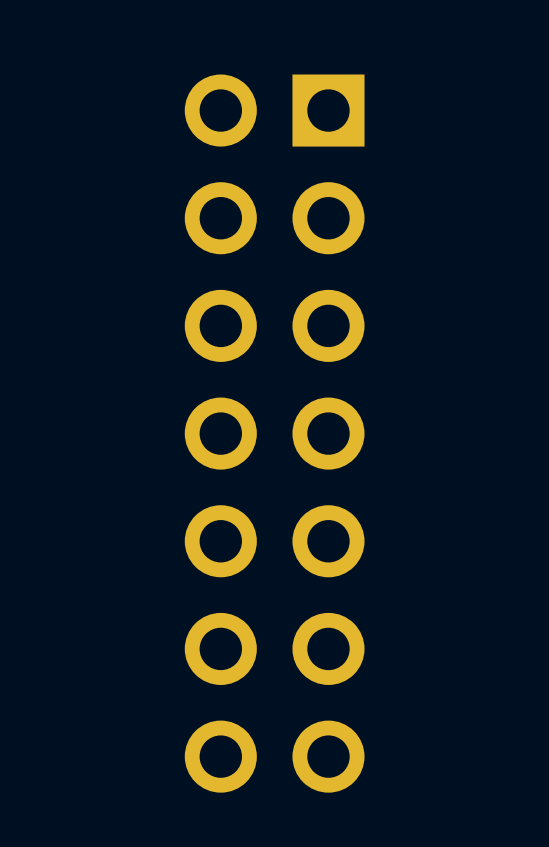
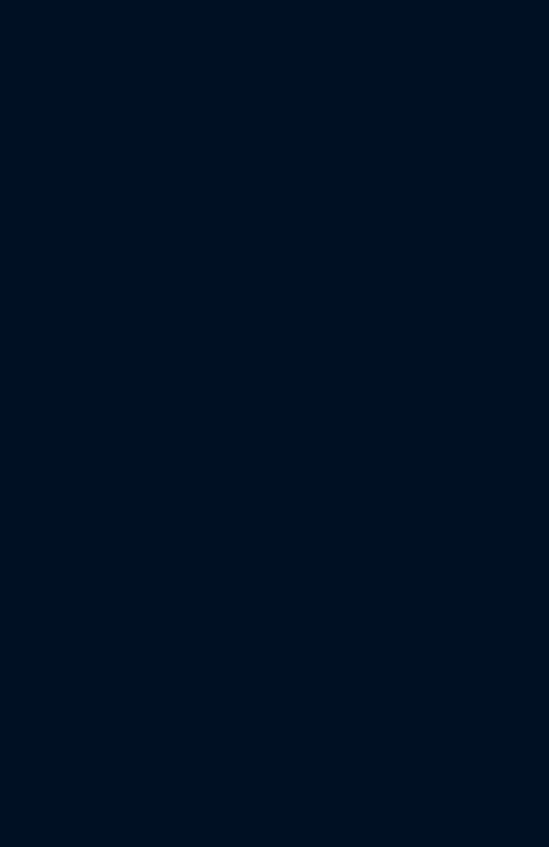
part: (274, 433) -> none

